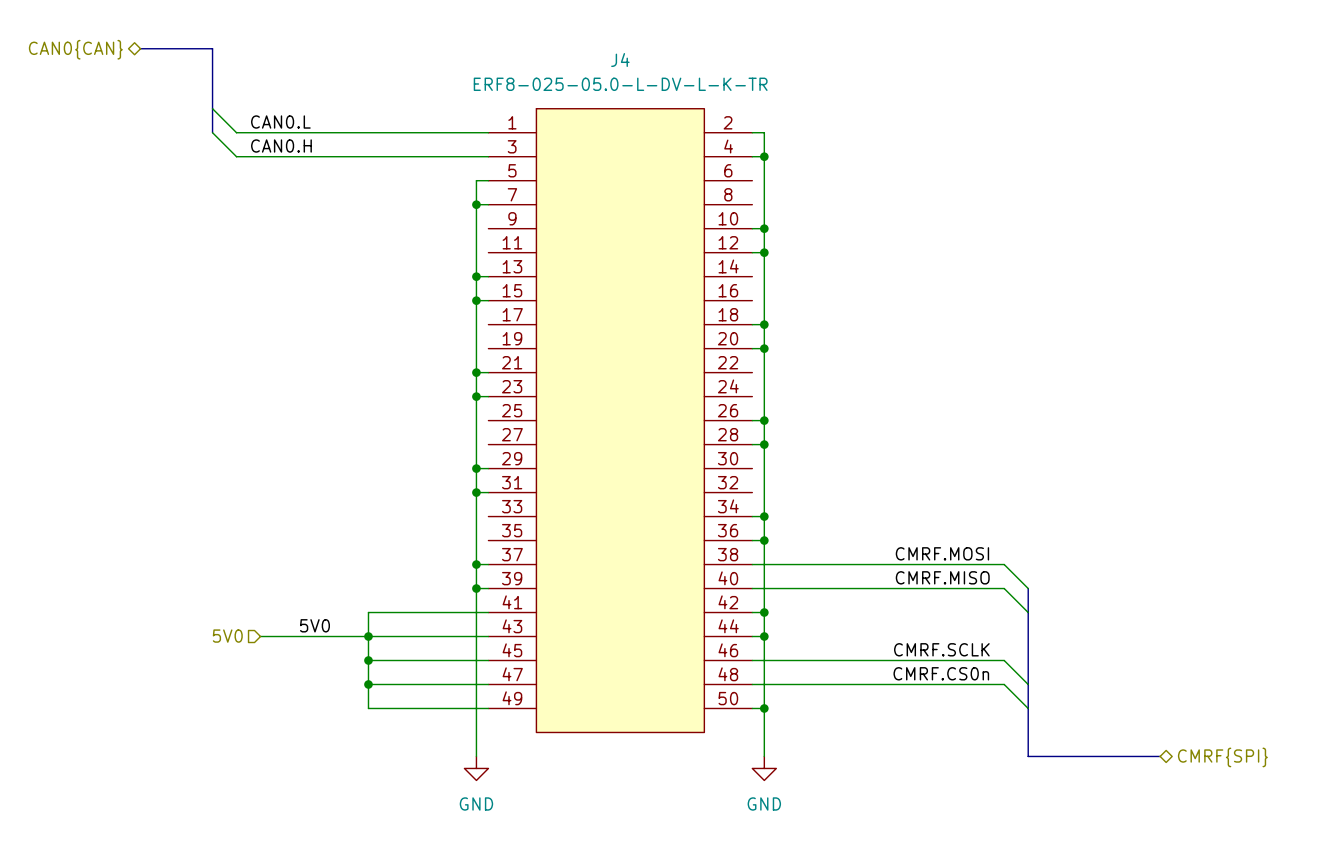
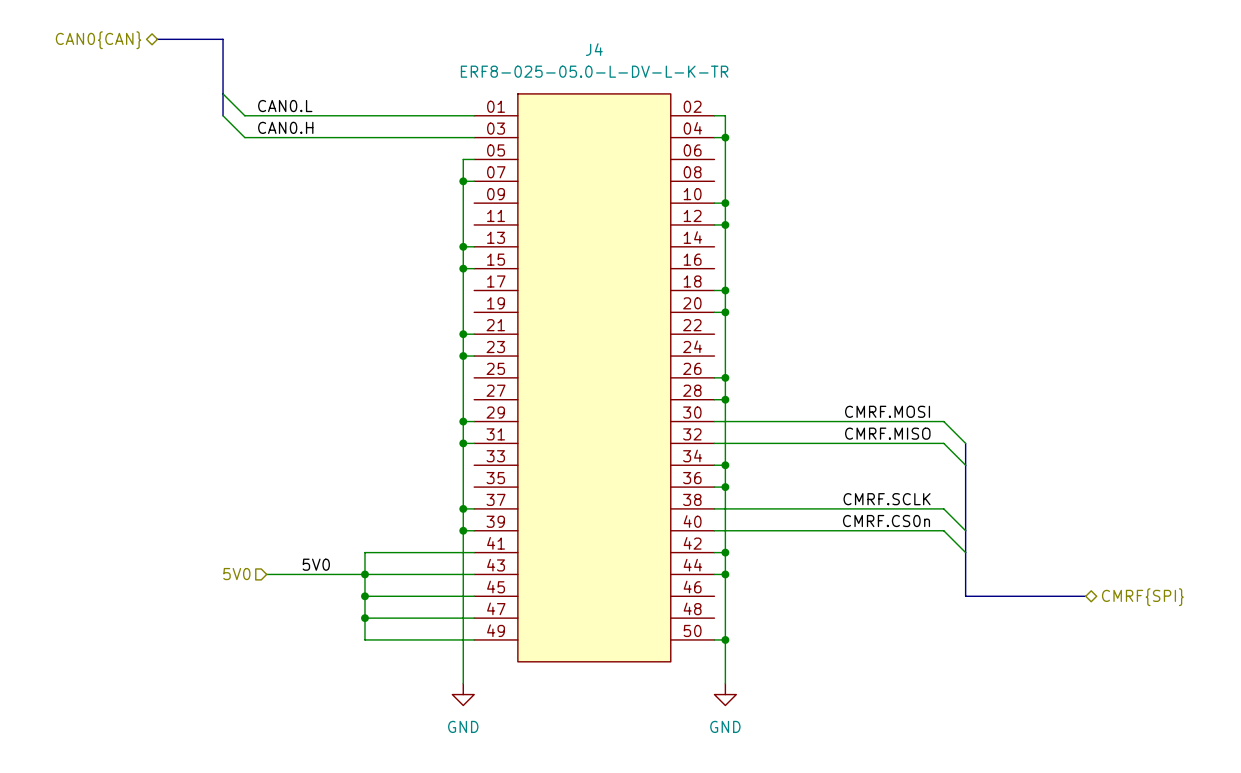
J4 symbol: [488, 108, 753, 733] -> [474, 93, 715, 662]
label: none -> CMRF.MOSI (887, 411)
label: none -> CMRF.MISO (887, 433)
bus: none -> (965, 443) (965, 530)
label: CMRF.MOSI (942, 553) -> CMRF.SCLK (887, 499)
label: CMRF.MISO (942, 577) -> CMRF.CS0n (886, 521)
label: CMRF.SCLK (941, 649) -> none
wire: (752, 660) (1004, 660) (1028, 684) -> (714, 443) (943, 443) (965, 465)
bus: (1028, 660) (1028, 756) (1160, 756) -> (965, 596) (1085, 596)
label: CMRF.CS0n (941, 673) -> none
wire: (752, 684) (1004, 684) (1028, 708) -> (714, 421) (943, 421) (965, 443)
hierarchical label position: CMRF{SPI} (1222, 757) -> CMRF{SPI} (1142, 597)

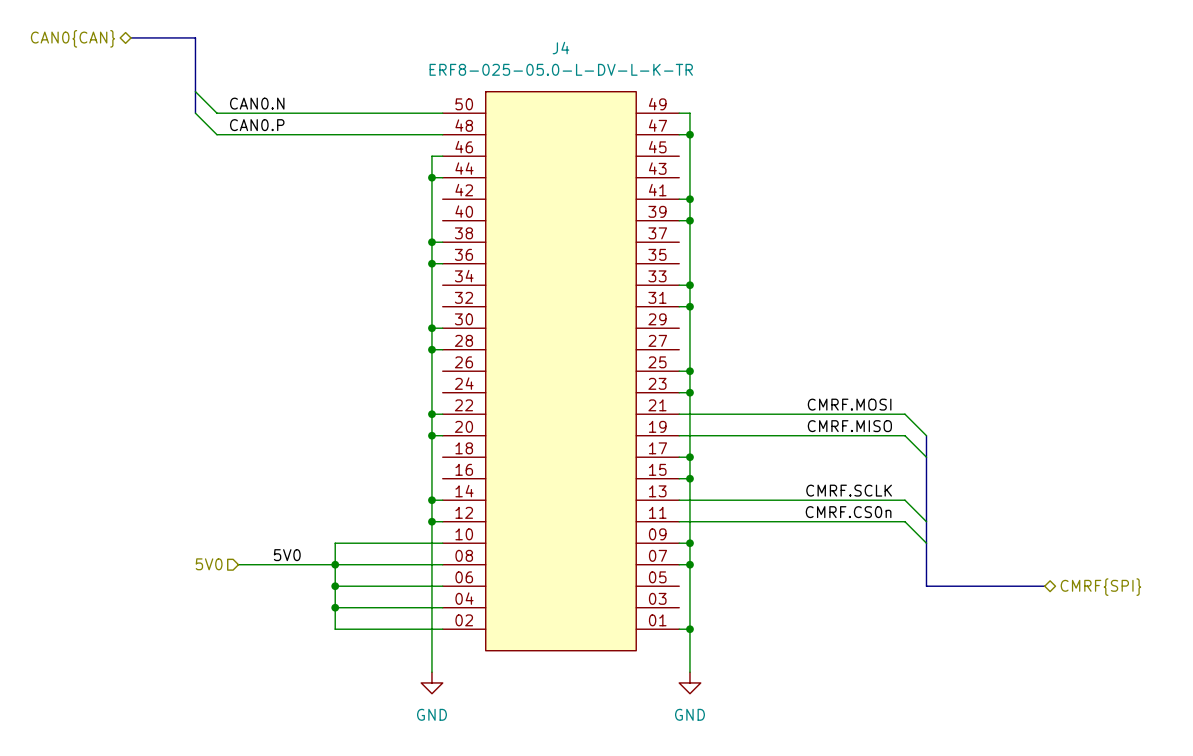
label: CAN0.L (285, 106) -> CAN0.N (257, 103)
label: CAN0.H (285, 127) -> CAN0.P (257, 125)
J4 rotation: 0° (594, 377) -> 180° (560, 371)

